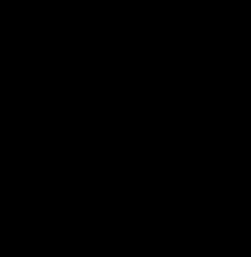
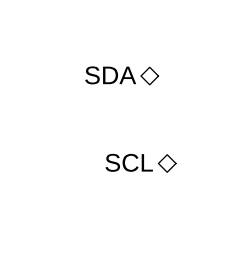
hierarchical label: none -> SDA (110, 75)
hierarchical label: none -> SCL (129, 162)

